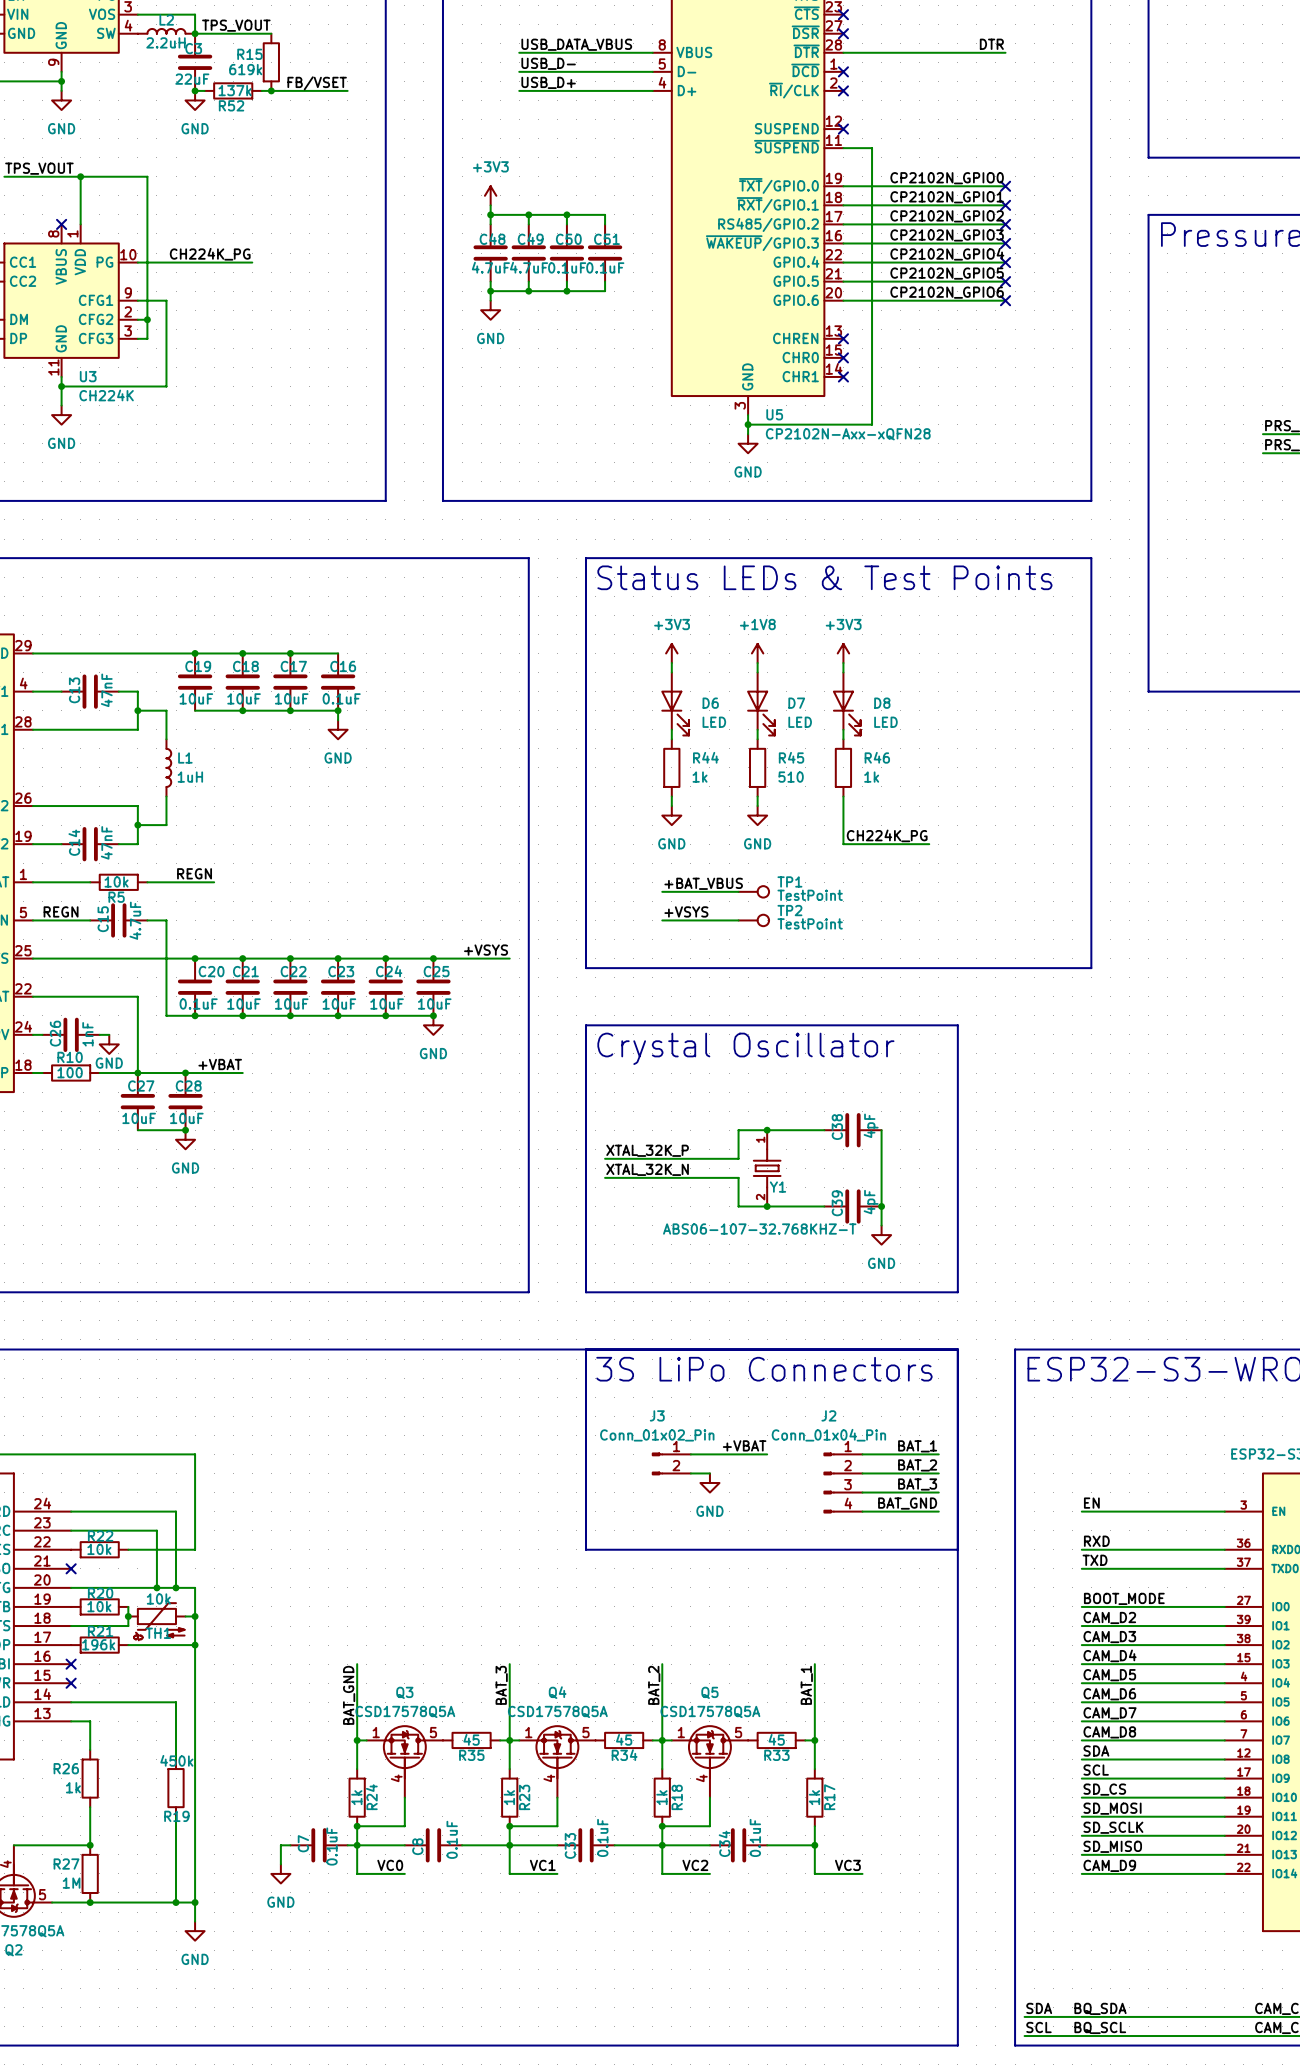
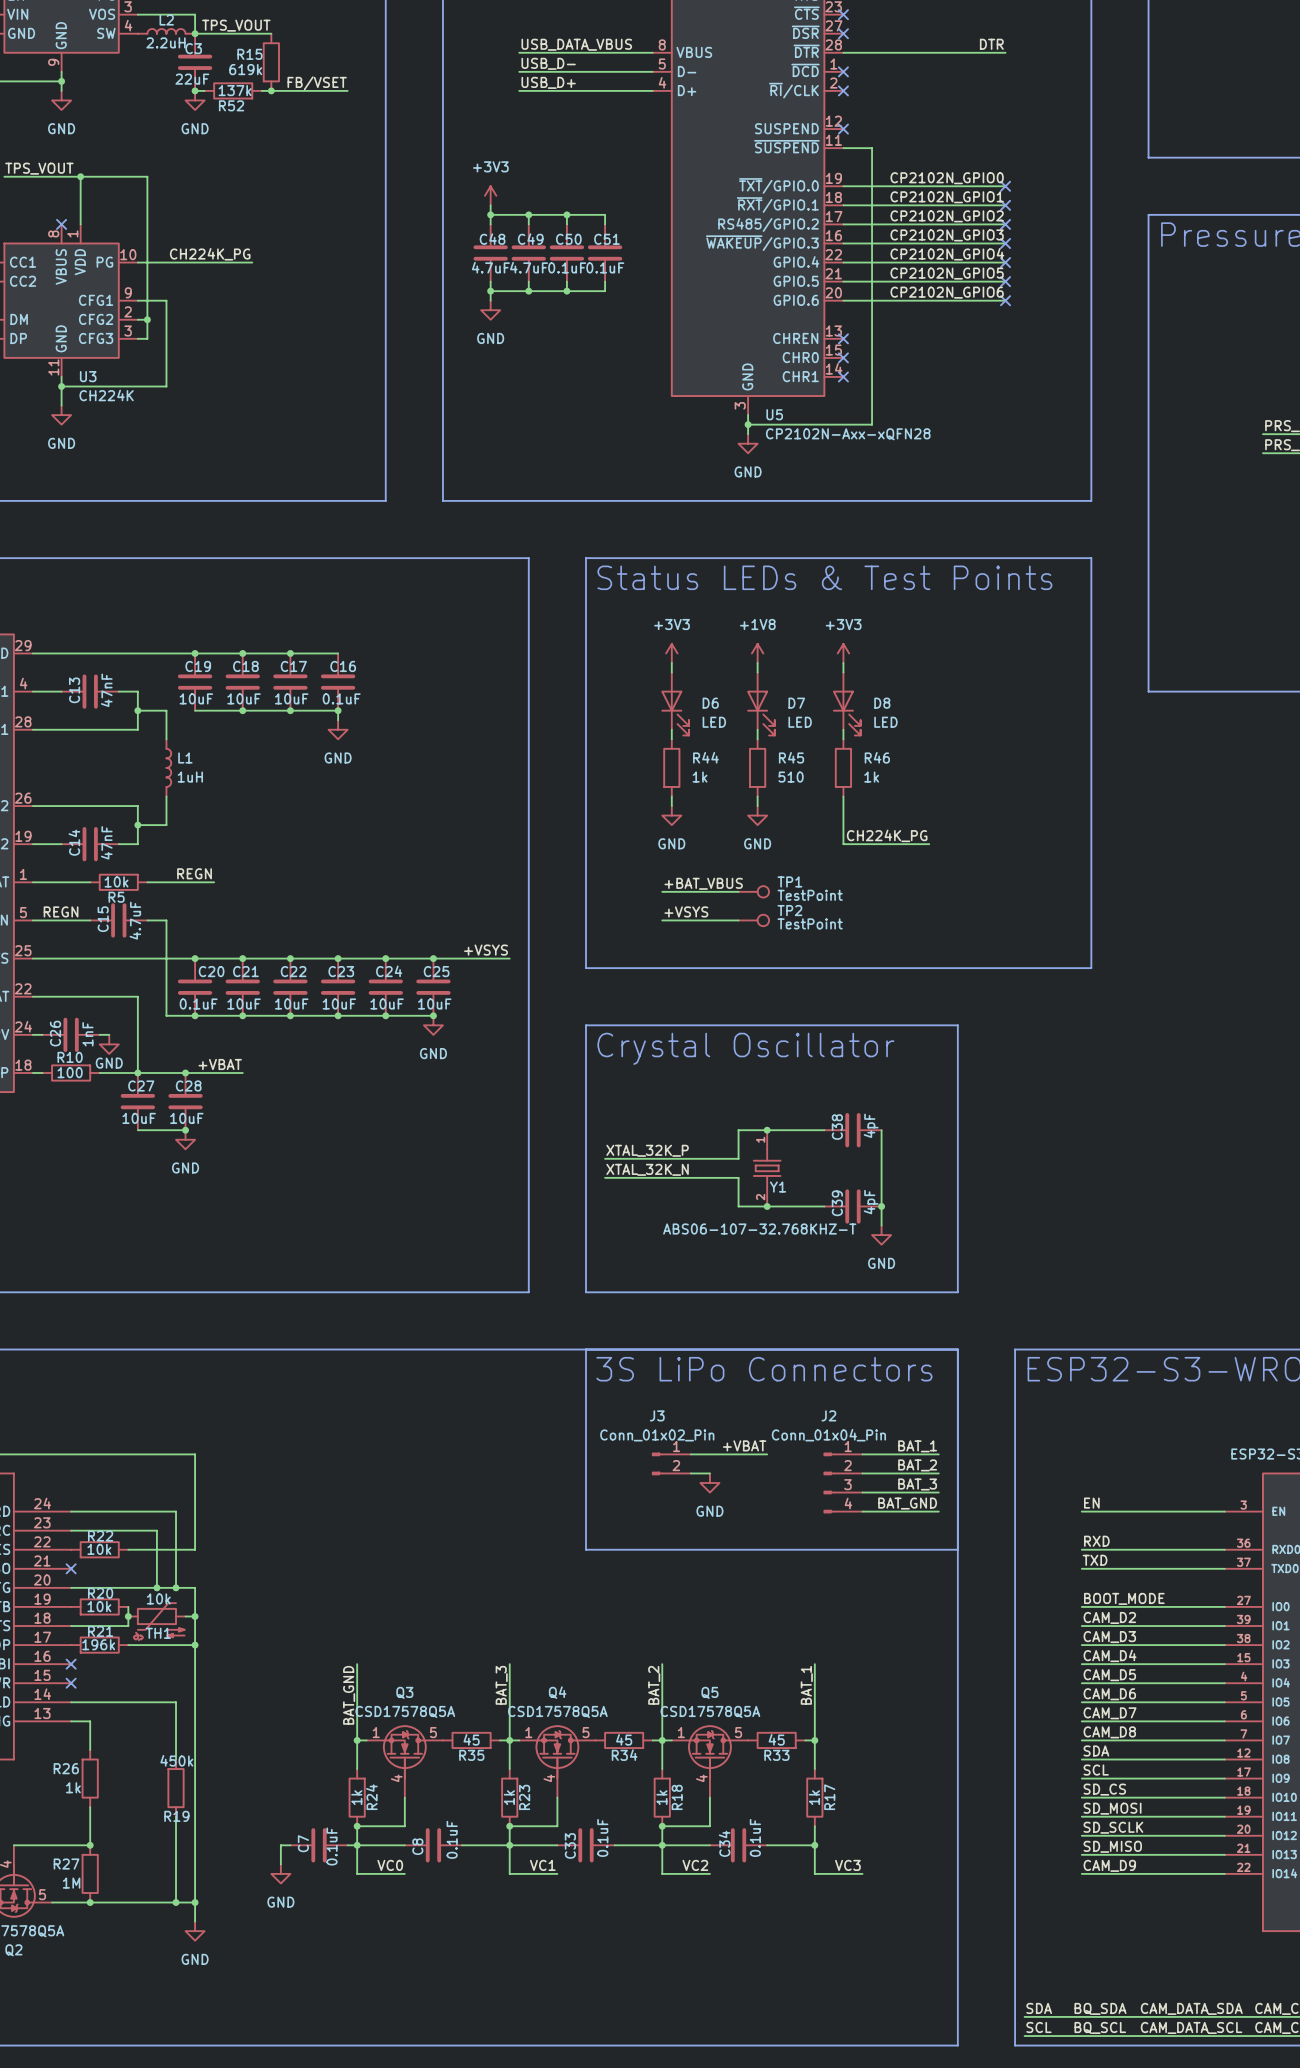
label: none -> CAM_DATA_SDA (1191, 2008)
label: none -> CAM_DATA_SCL (1191, 2027)

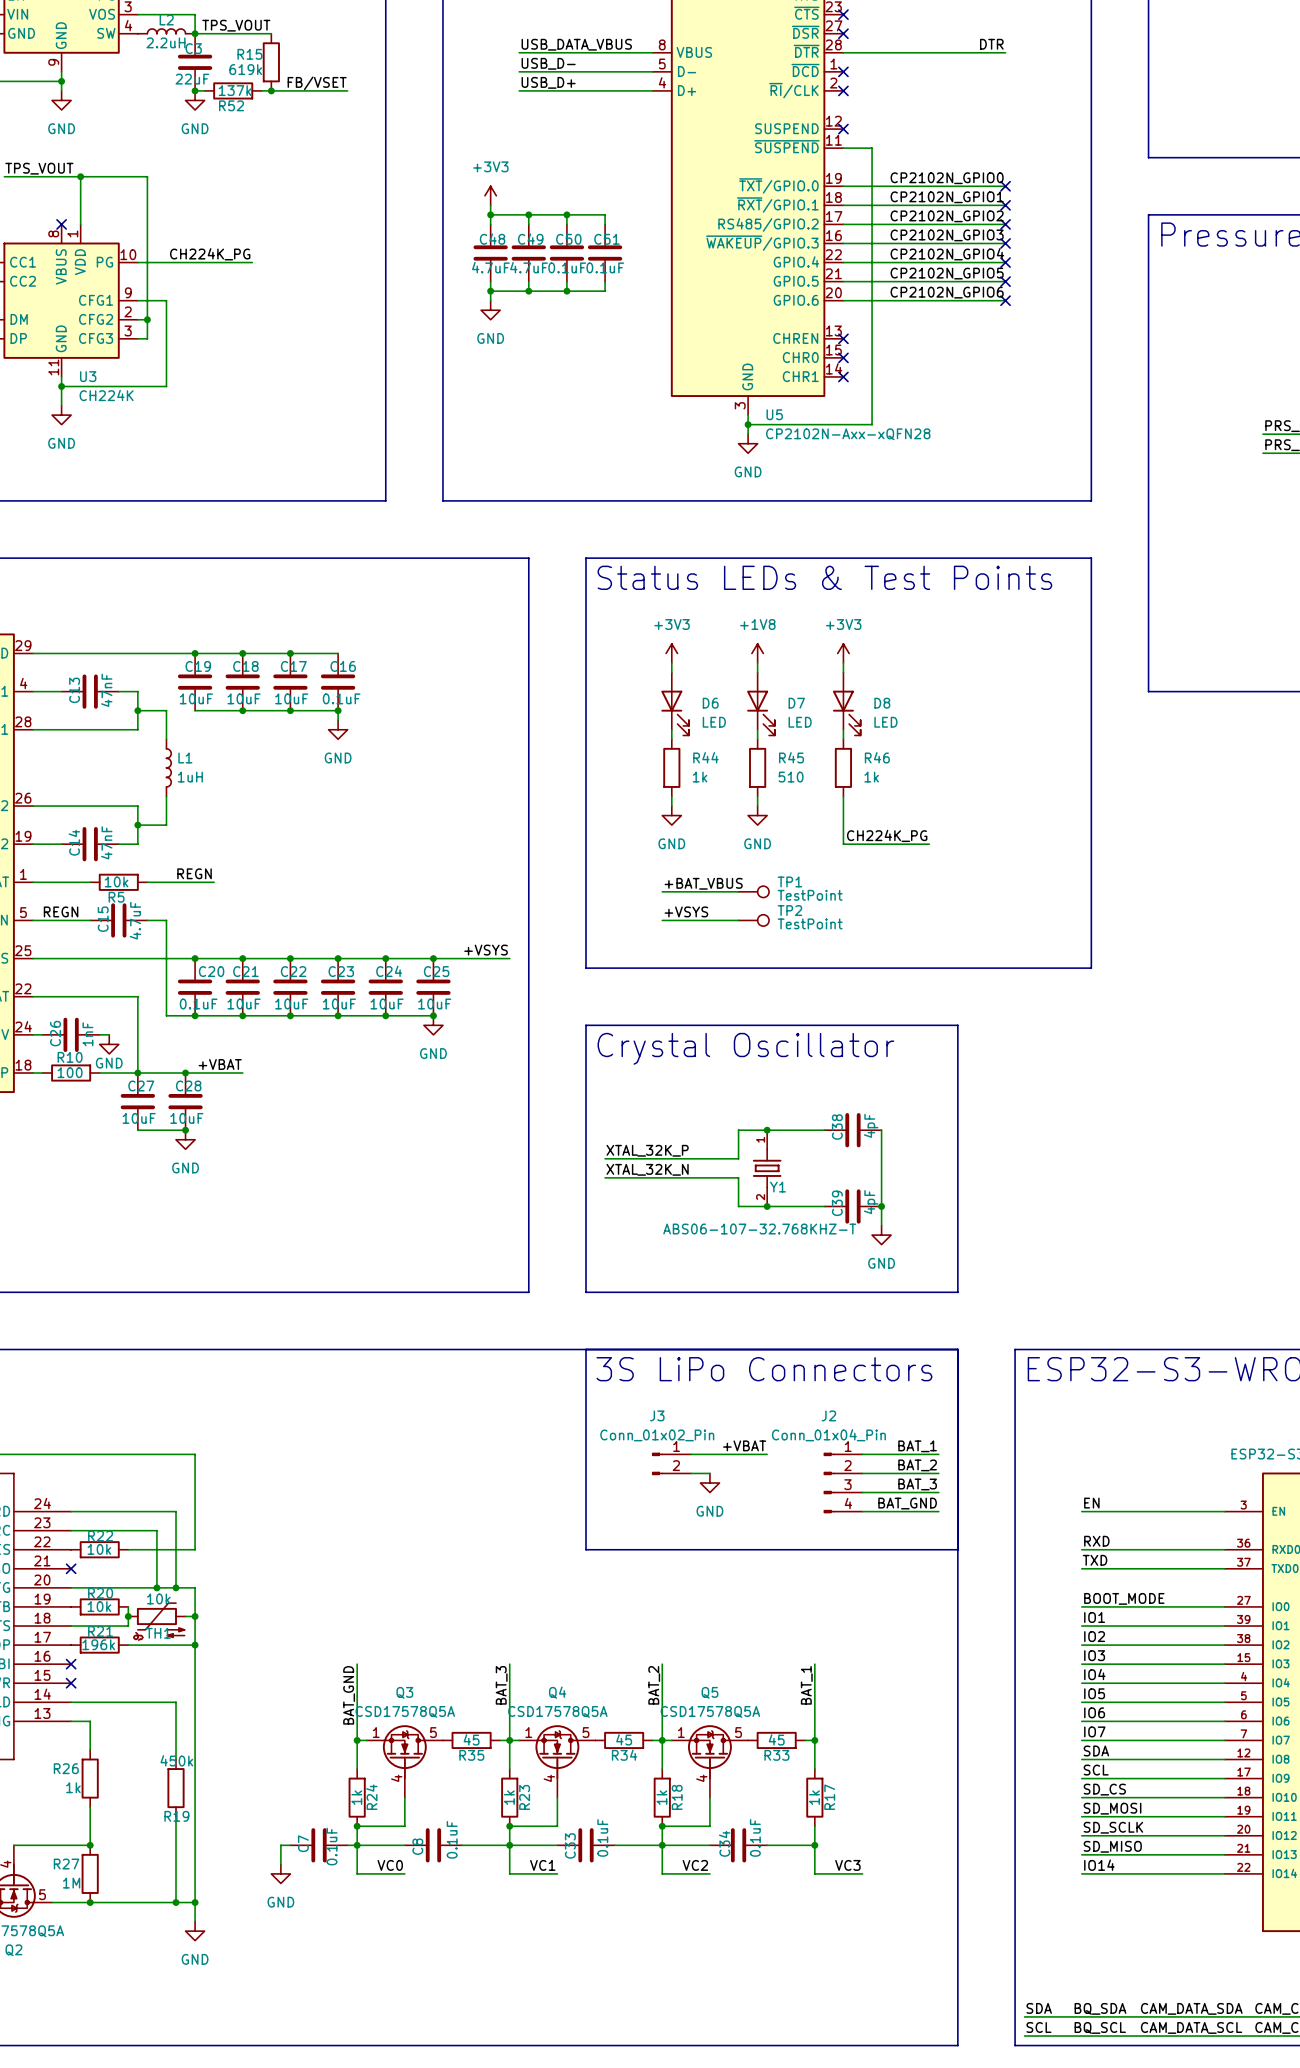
label: CAM_D2 (1109, 1617) -> IO1 (1094, 1617)
label: CAM_D3 (1109, 1637) -> IO2 (1094, 1636)
label: CAM_D4 (1110, 1655) -> IO3 (1094, 1655)
label: CAM_D5 (1109, 1675) -> IO4 (1094, 1674)
label: CAM_D6 (1109, 1694) -> IO5 (1094, 1693)
label: CAM_D7 (1110, 1713) -> IO6 (1094, 1712)
label: CAM_D8 (1109, 1732) -> IO7 (1094, 1731)
label: CAM_D9 (1109, 1865) -> IO14 (1099, 1865)

